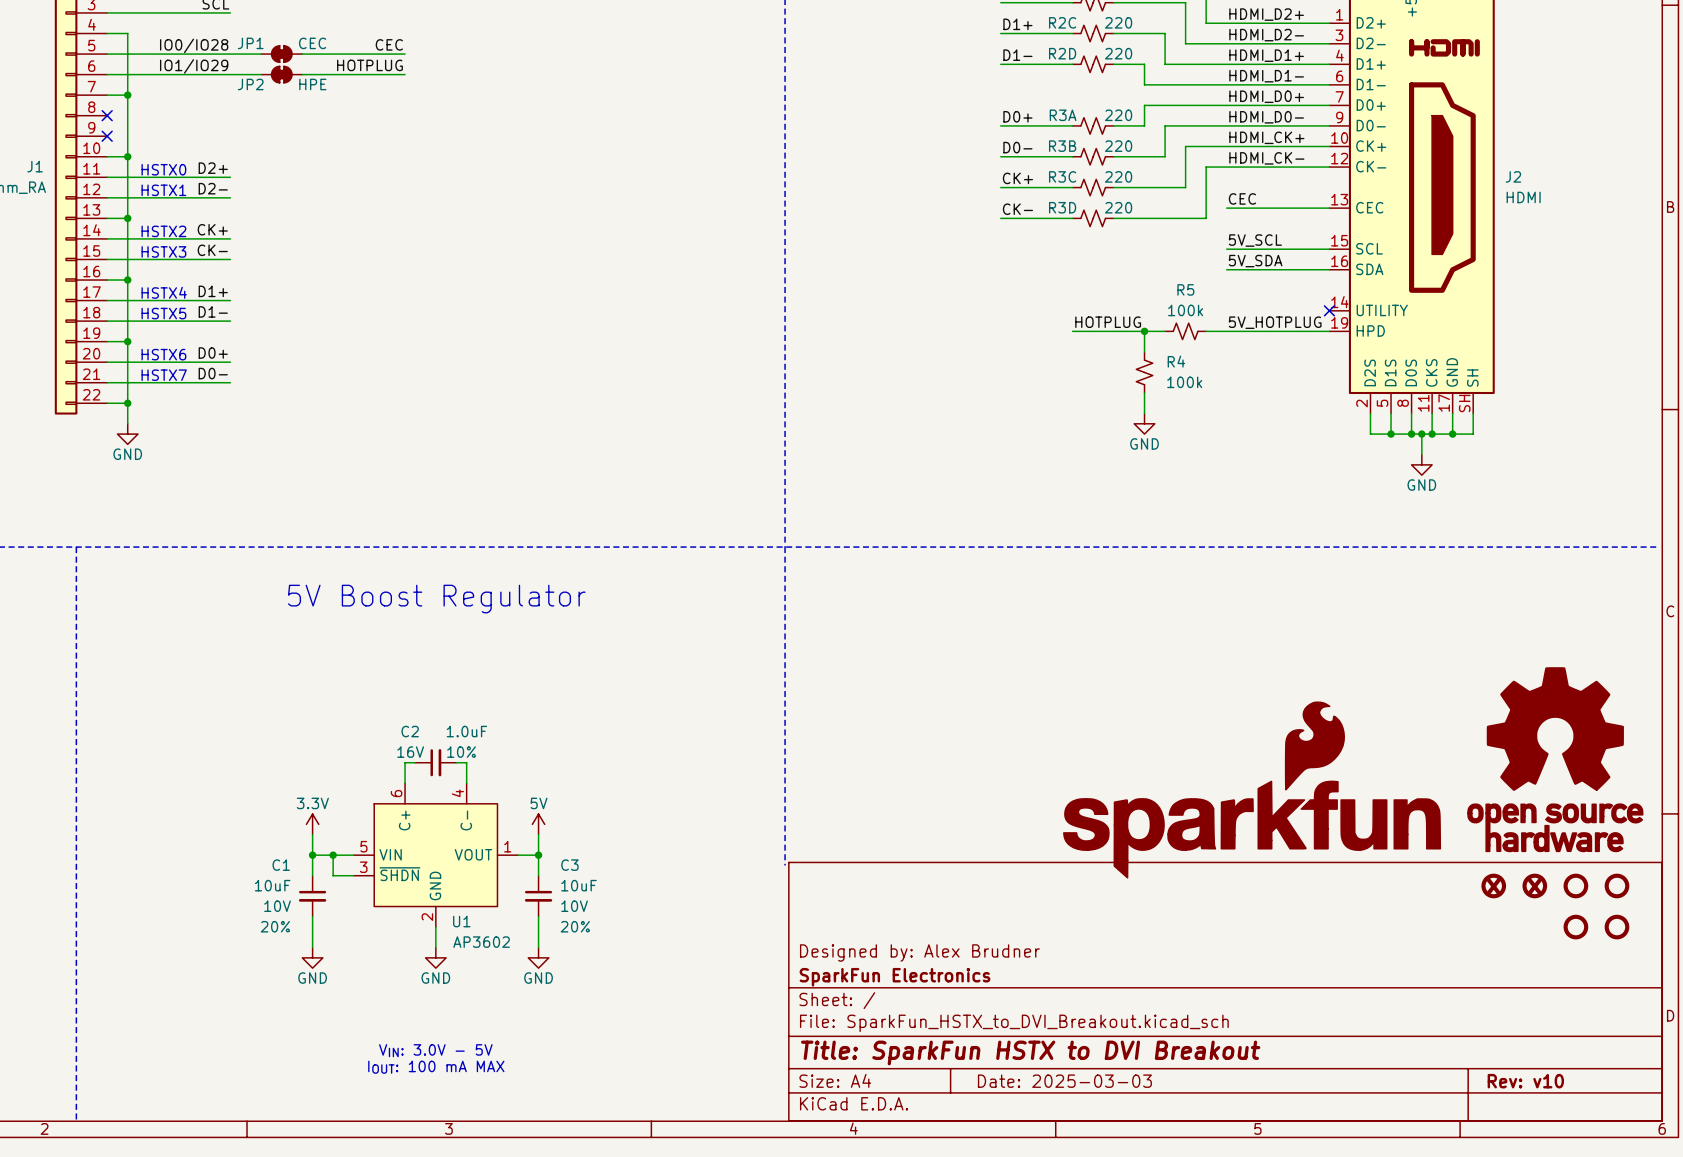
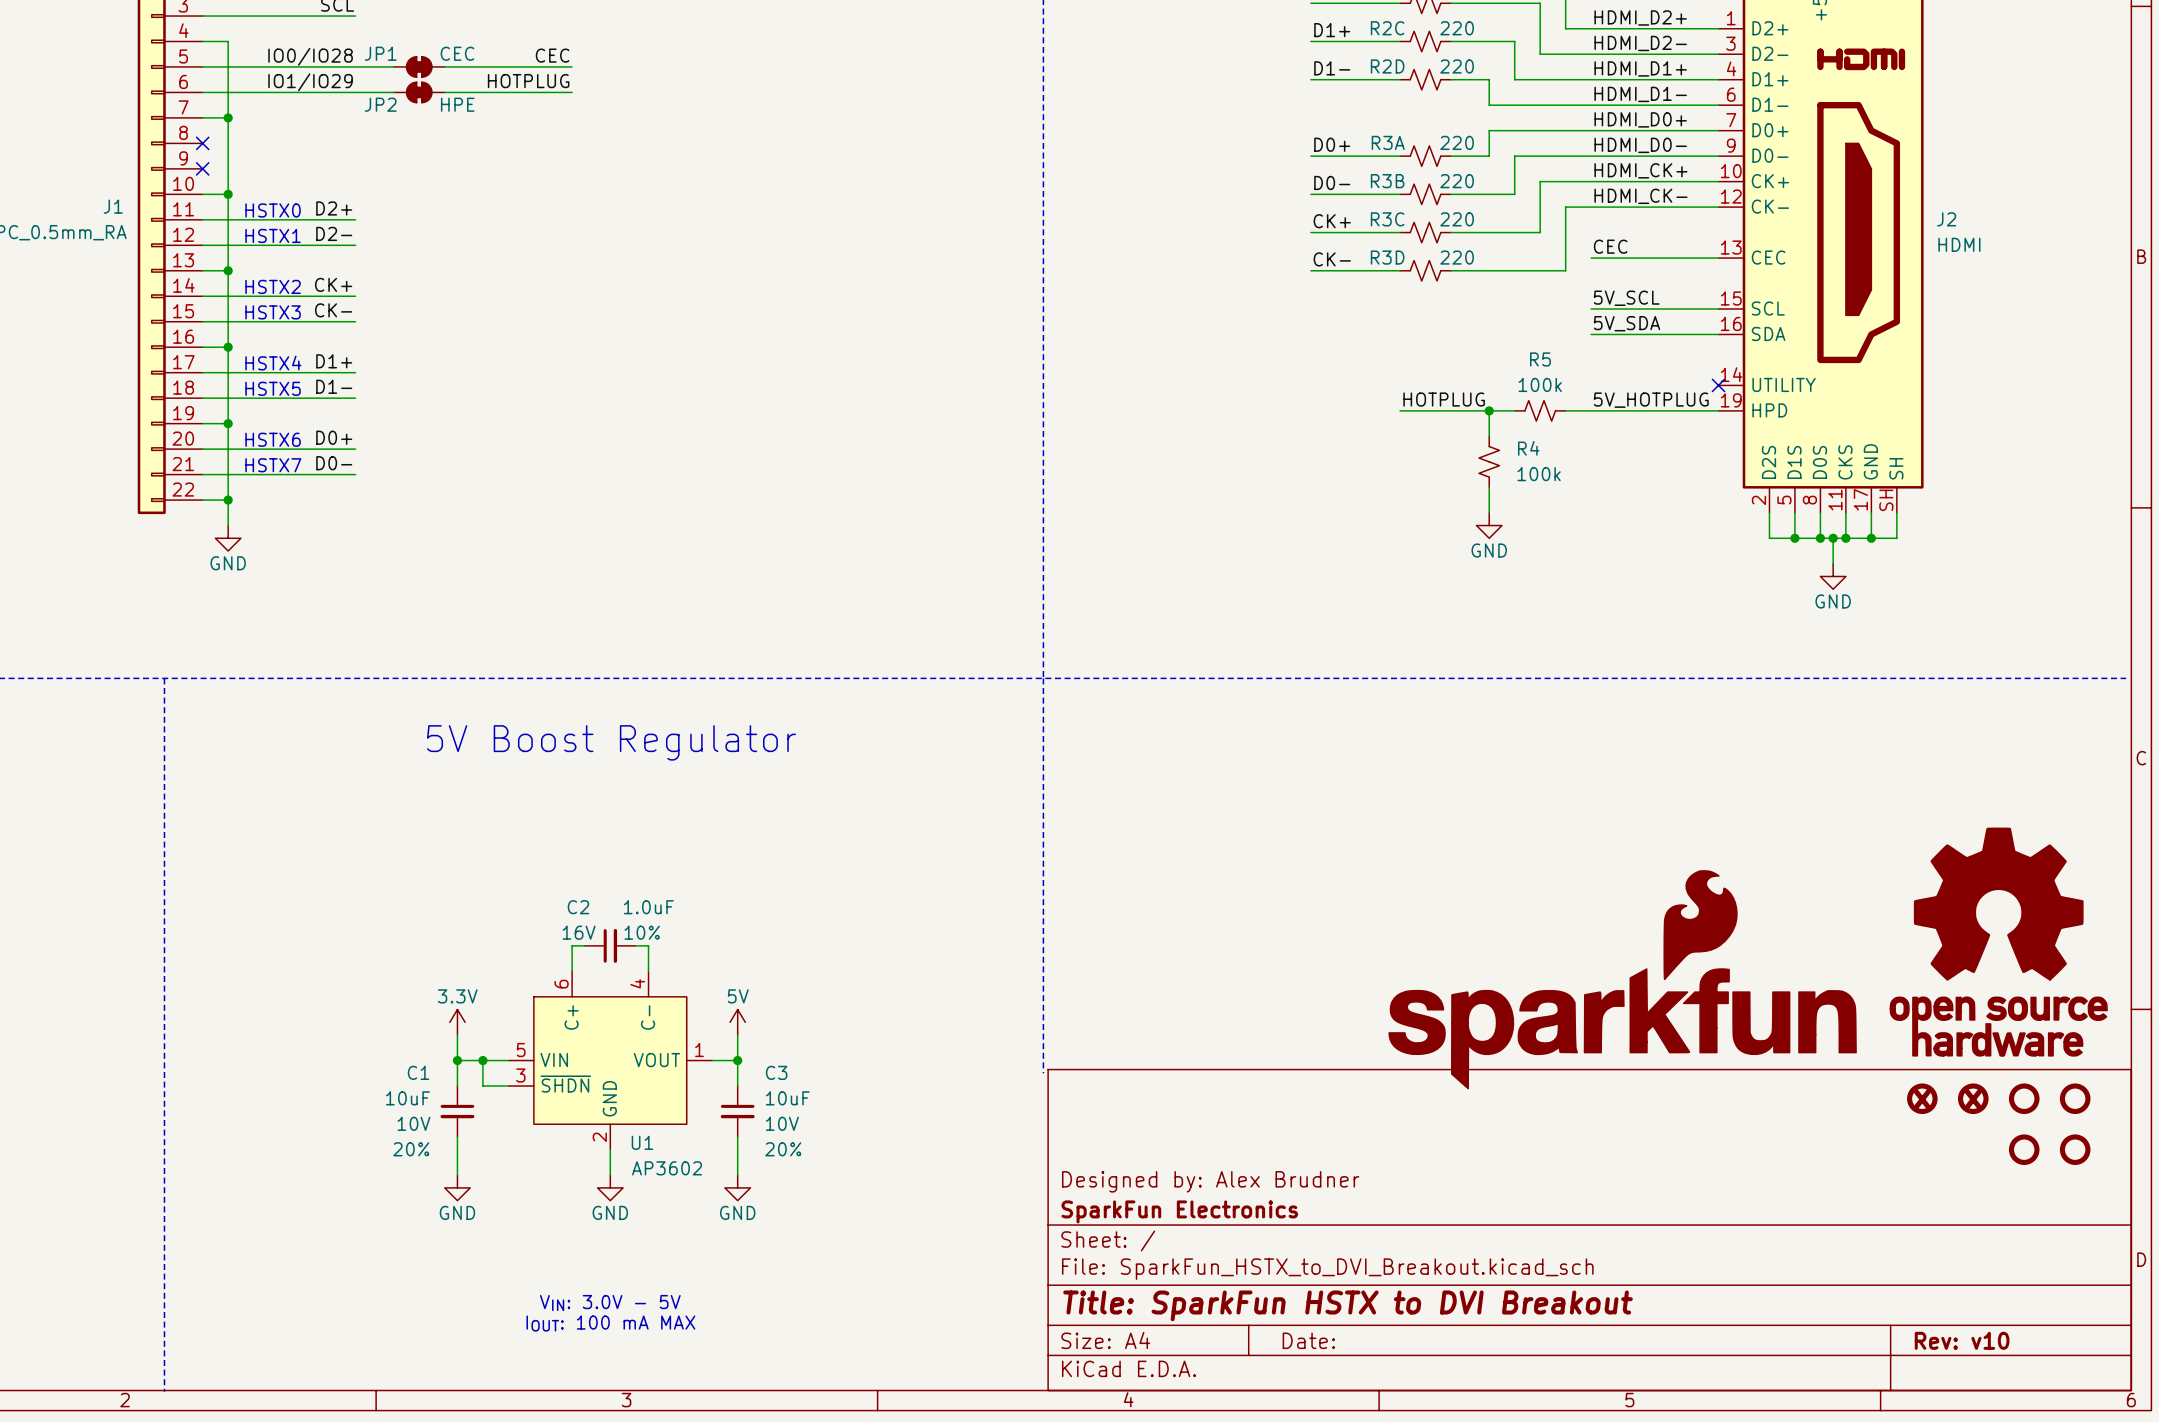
title block: Date: 2025-03-03 (1064, 1081) -> Date: (1308, 1340)

